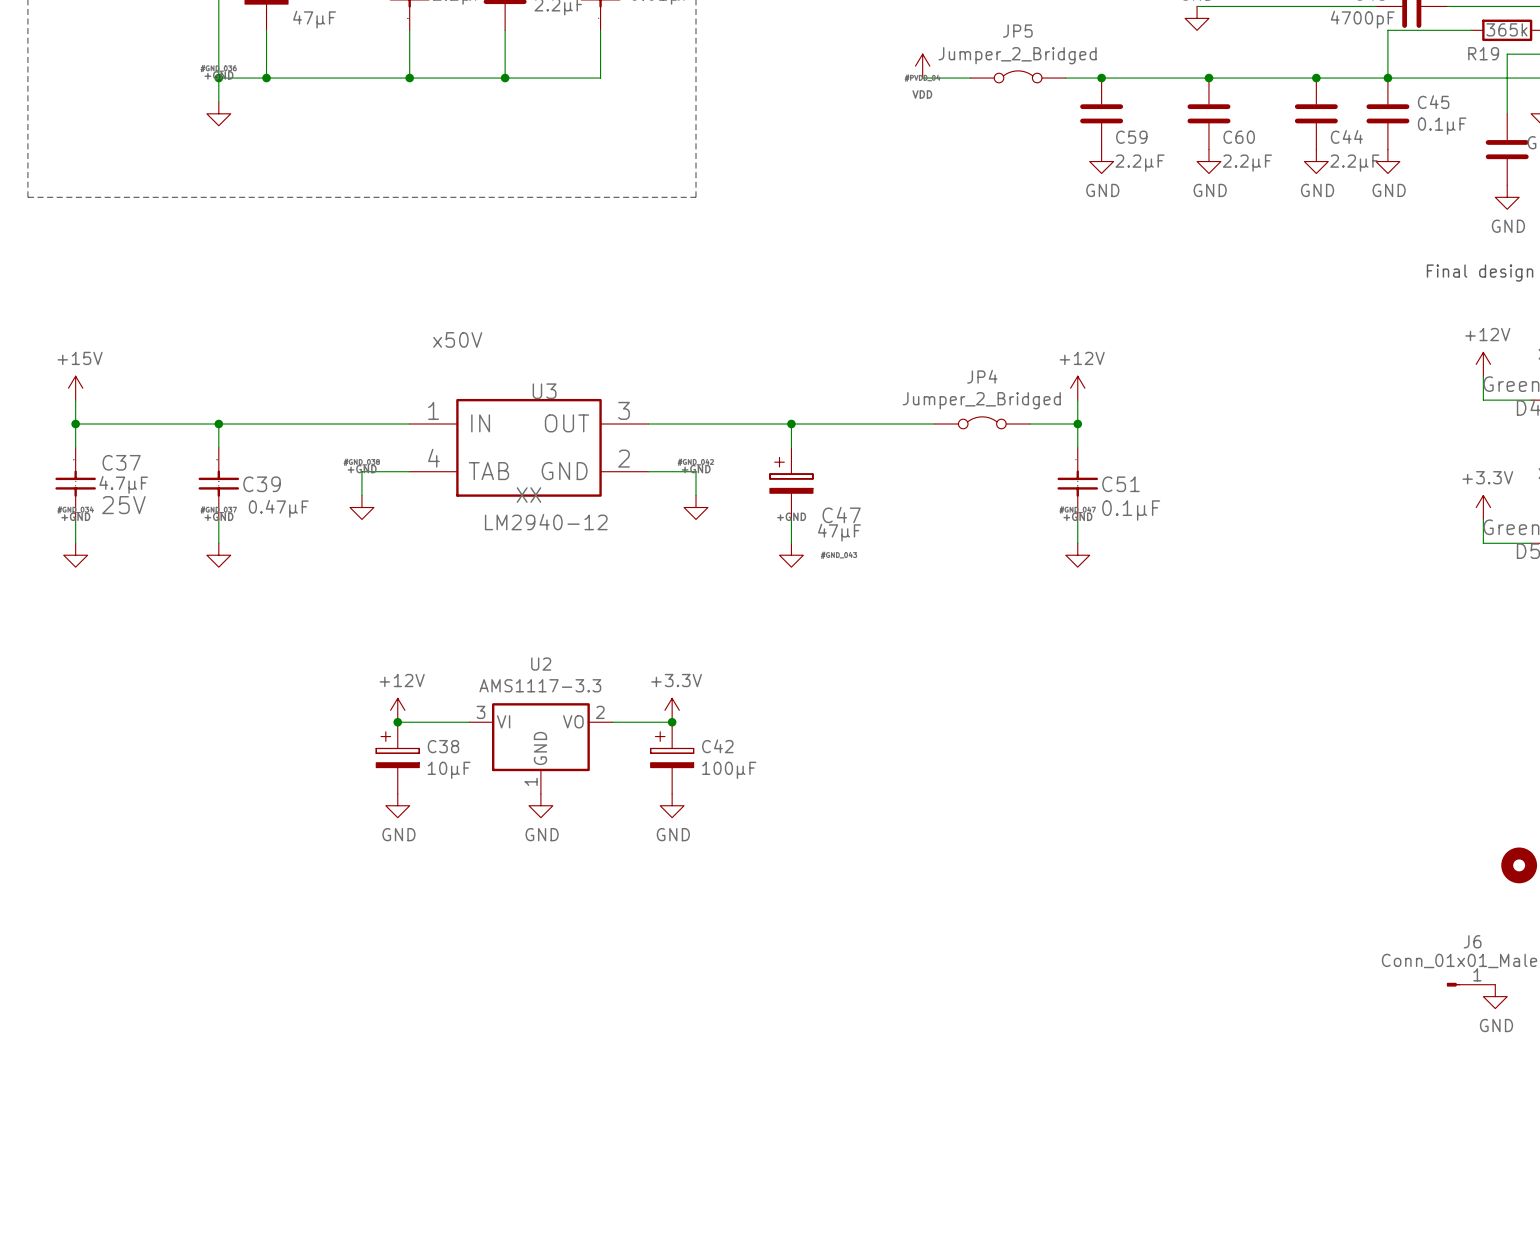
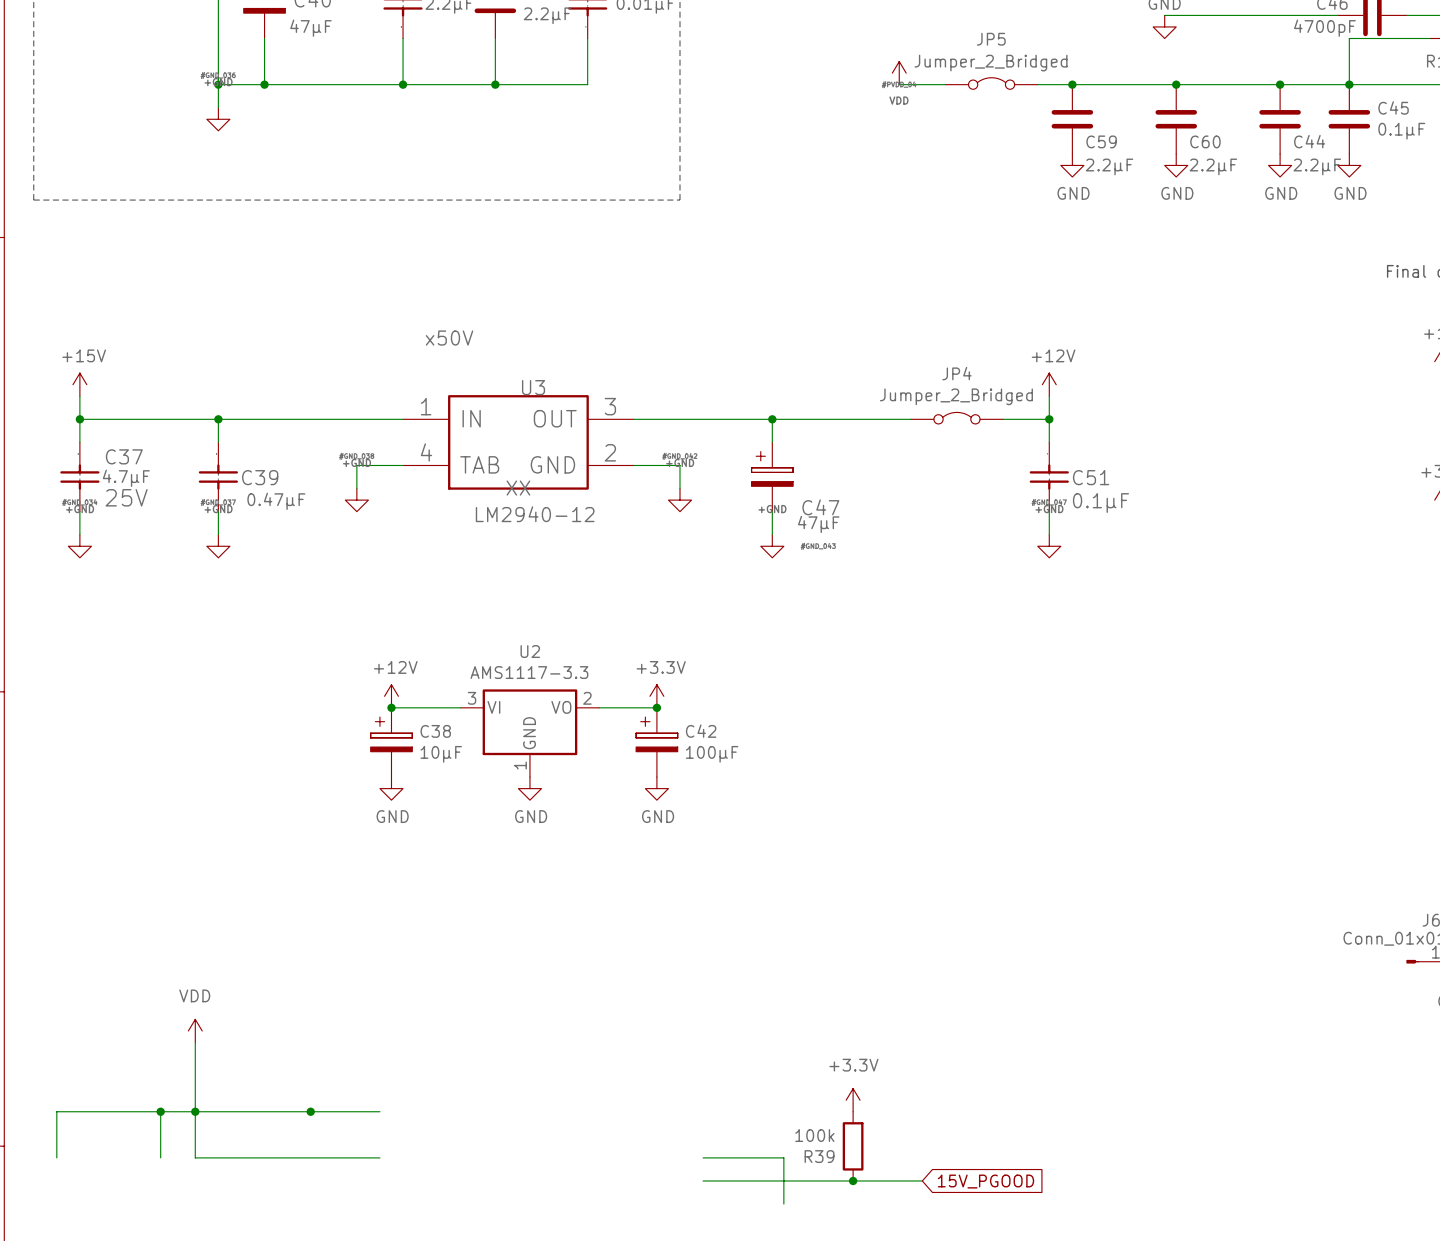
power symbol: none -> VDD (195, 1030)
wire: none -> (195, 1042) (195, 1157) (379, 1157)
power symbol: none -> +3.3V (853, 1100)
wire: none -> (160, 1111) (160, 1157)
junction: none -> (160, 1111)
junction: none -> (195, 1111)
junction: none -> (310, 1111)
wire: none -> (379, 1111) (56, 1111) (56, 1157)
R39: none -> 100k (853, 1146)
wire: none -> (703, 1157) (783, 1157) (783, 1204)
wire: none -> (703, 1180) (922, 1180)
junction: none -> (853, 1180)
global label: none -> 15V_PGOOD (985, 1181)

